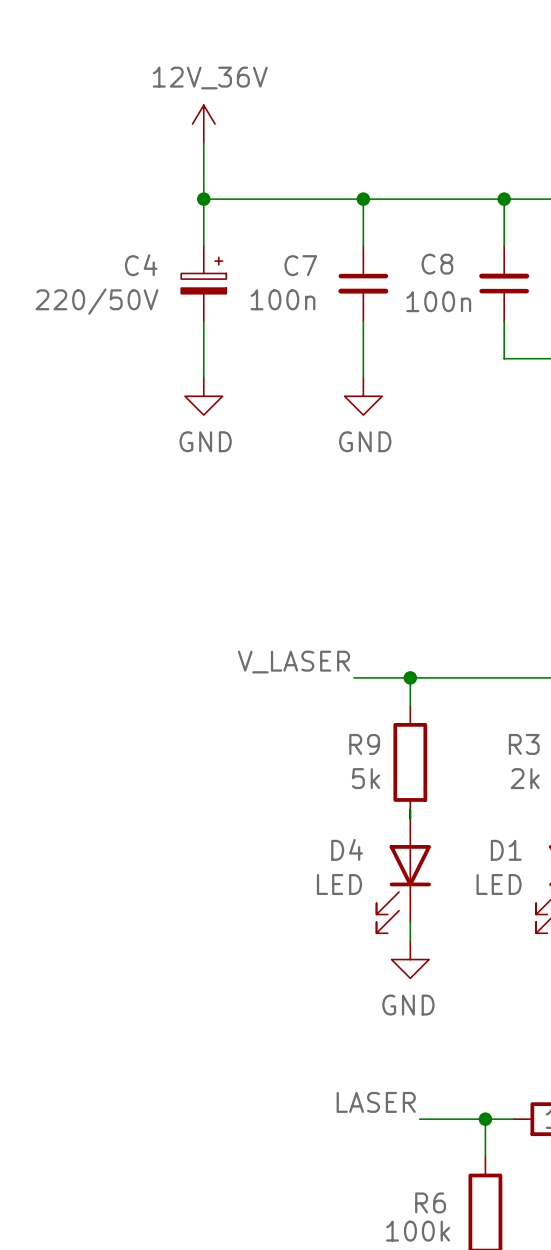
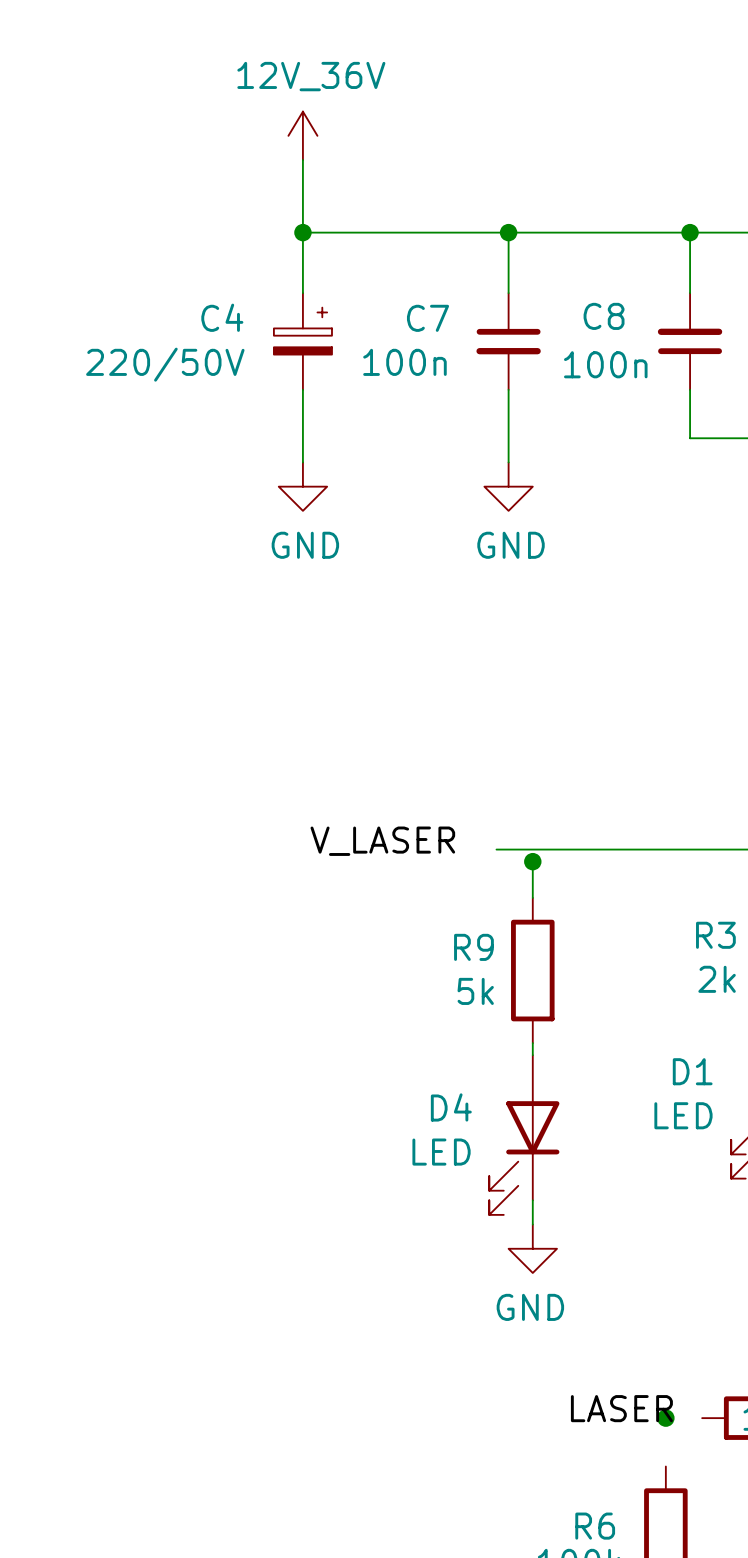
label position: V_LASER (293, 662) -> V_LASER (382, 841)
wire: (410, 677) (410, 706) -> (532, 861) (532, 897)
junction position: (410, 677) -> (532, 861)
R9 position: (410, 762) -> (532, 970)
wire: (410, 809) (410, 818) -> (532, 1043) (532, 1055)
D4 position: (403, 871) -> (524, 1135)
wire: (410, 922) (410, 940) -> (532, 1200) (532, 1224)
power symbol position: GND (410, 959) -> GND (532, 1248)
label position: LASER (376, 1102) -> LASER (621, 1408)
wire: (419, 1119) (513, 1119) -> none
wire: (485, 1119) (485, 1156) -> none

